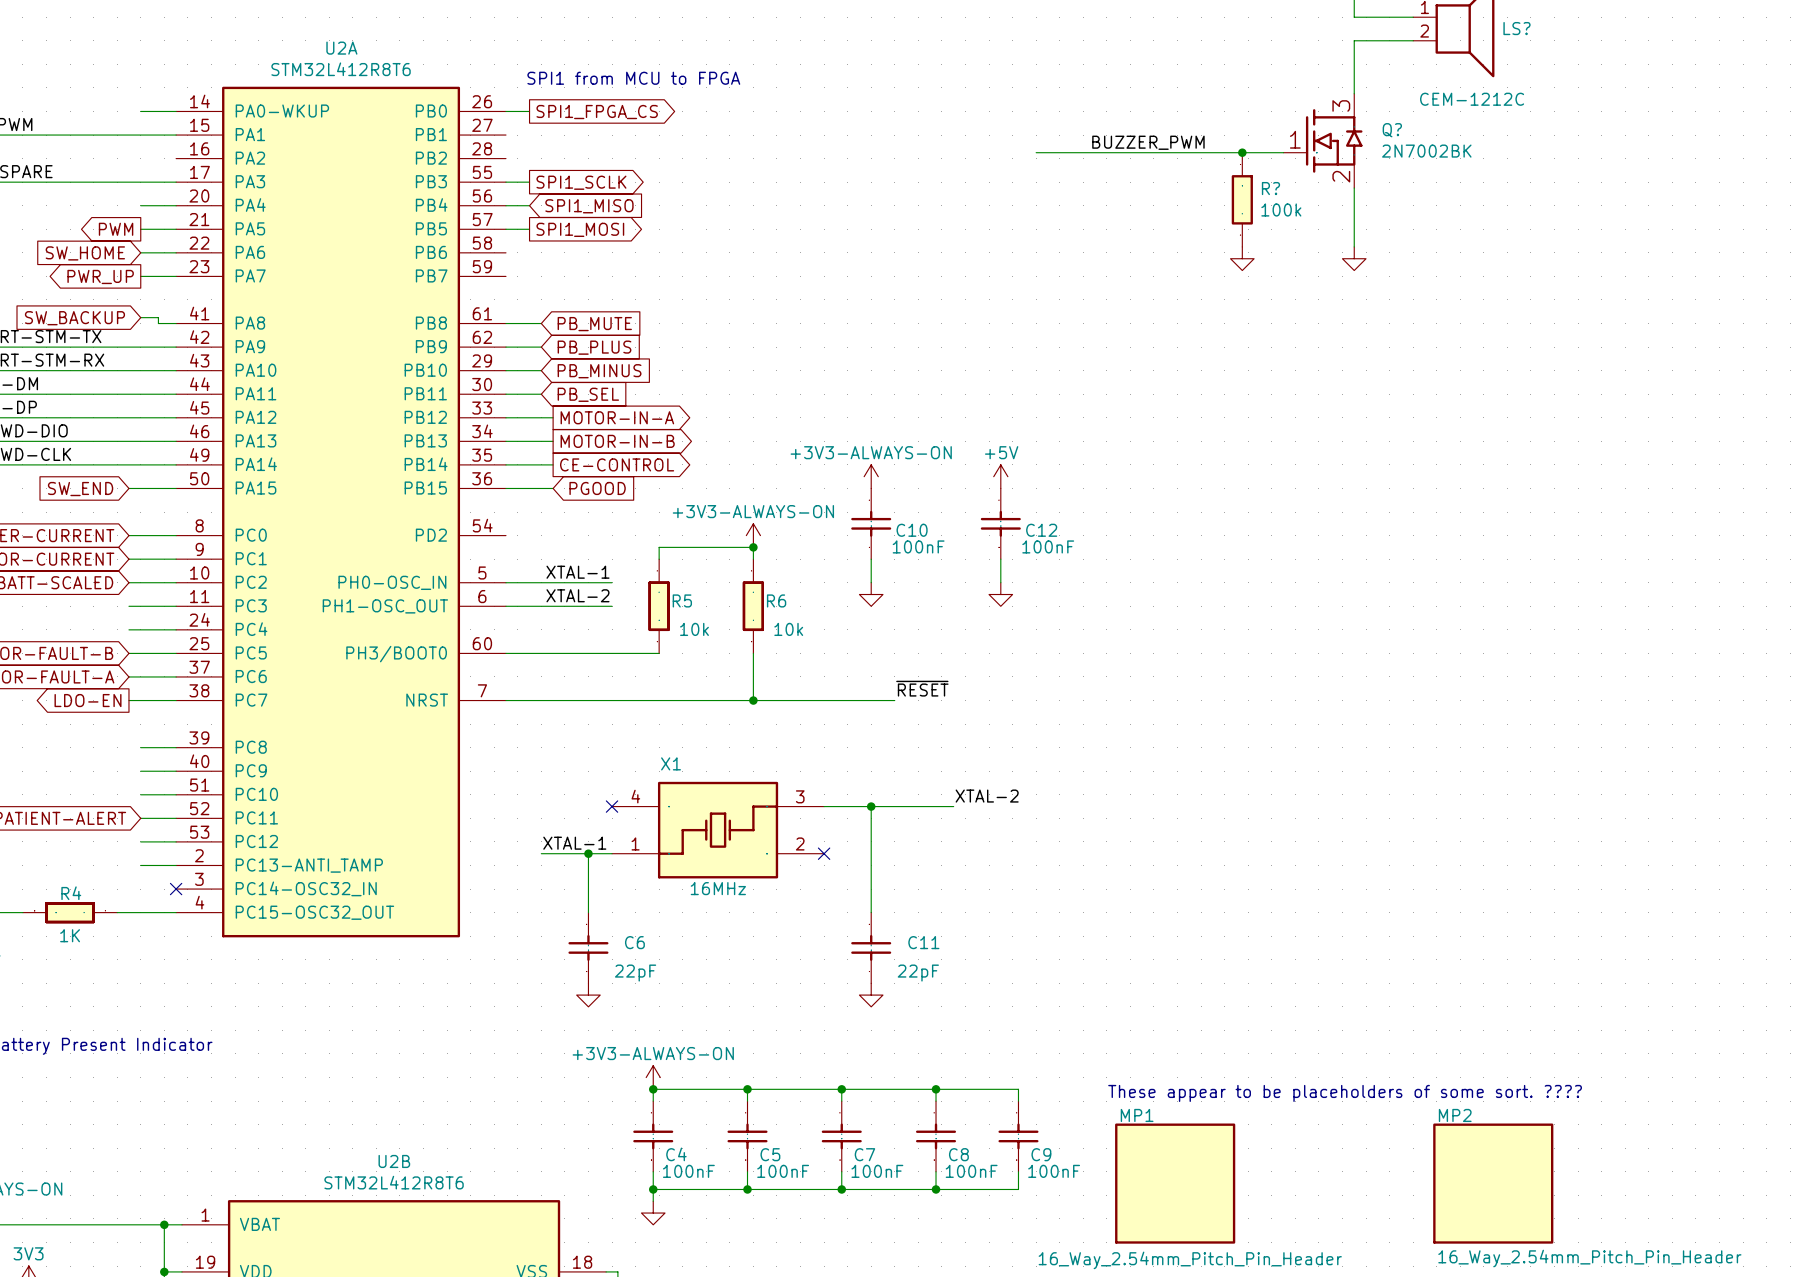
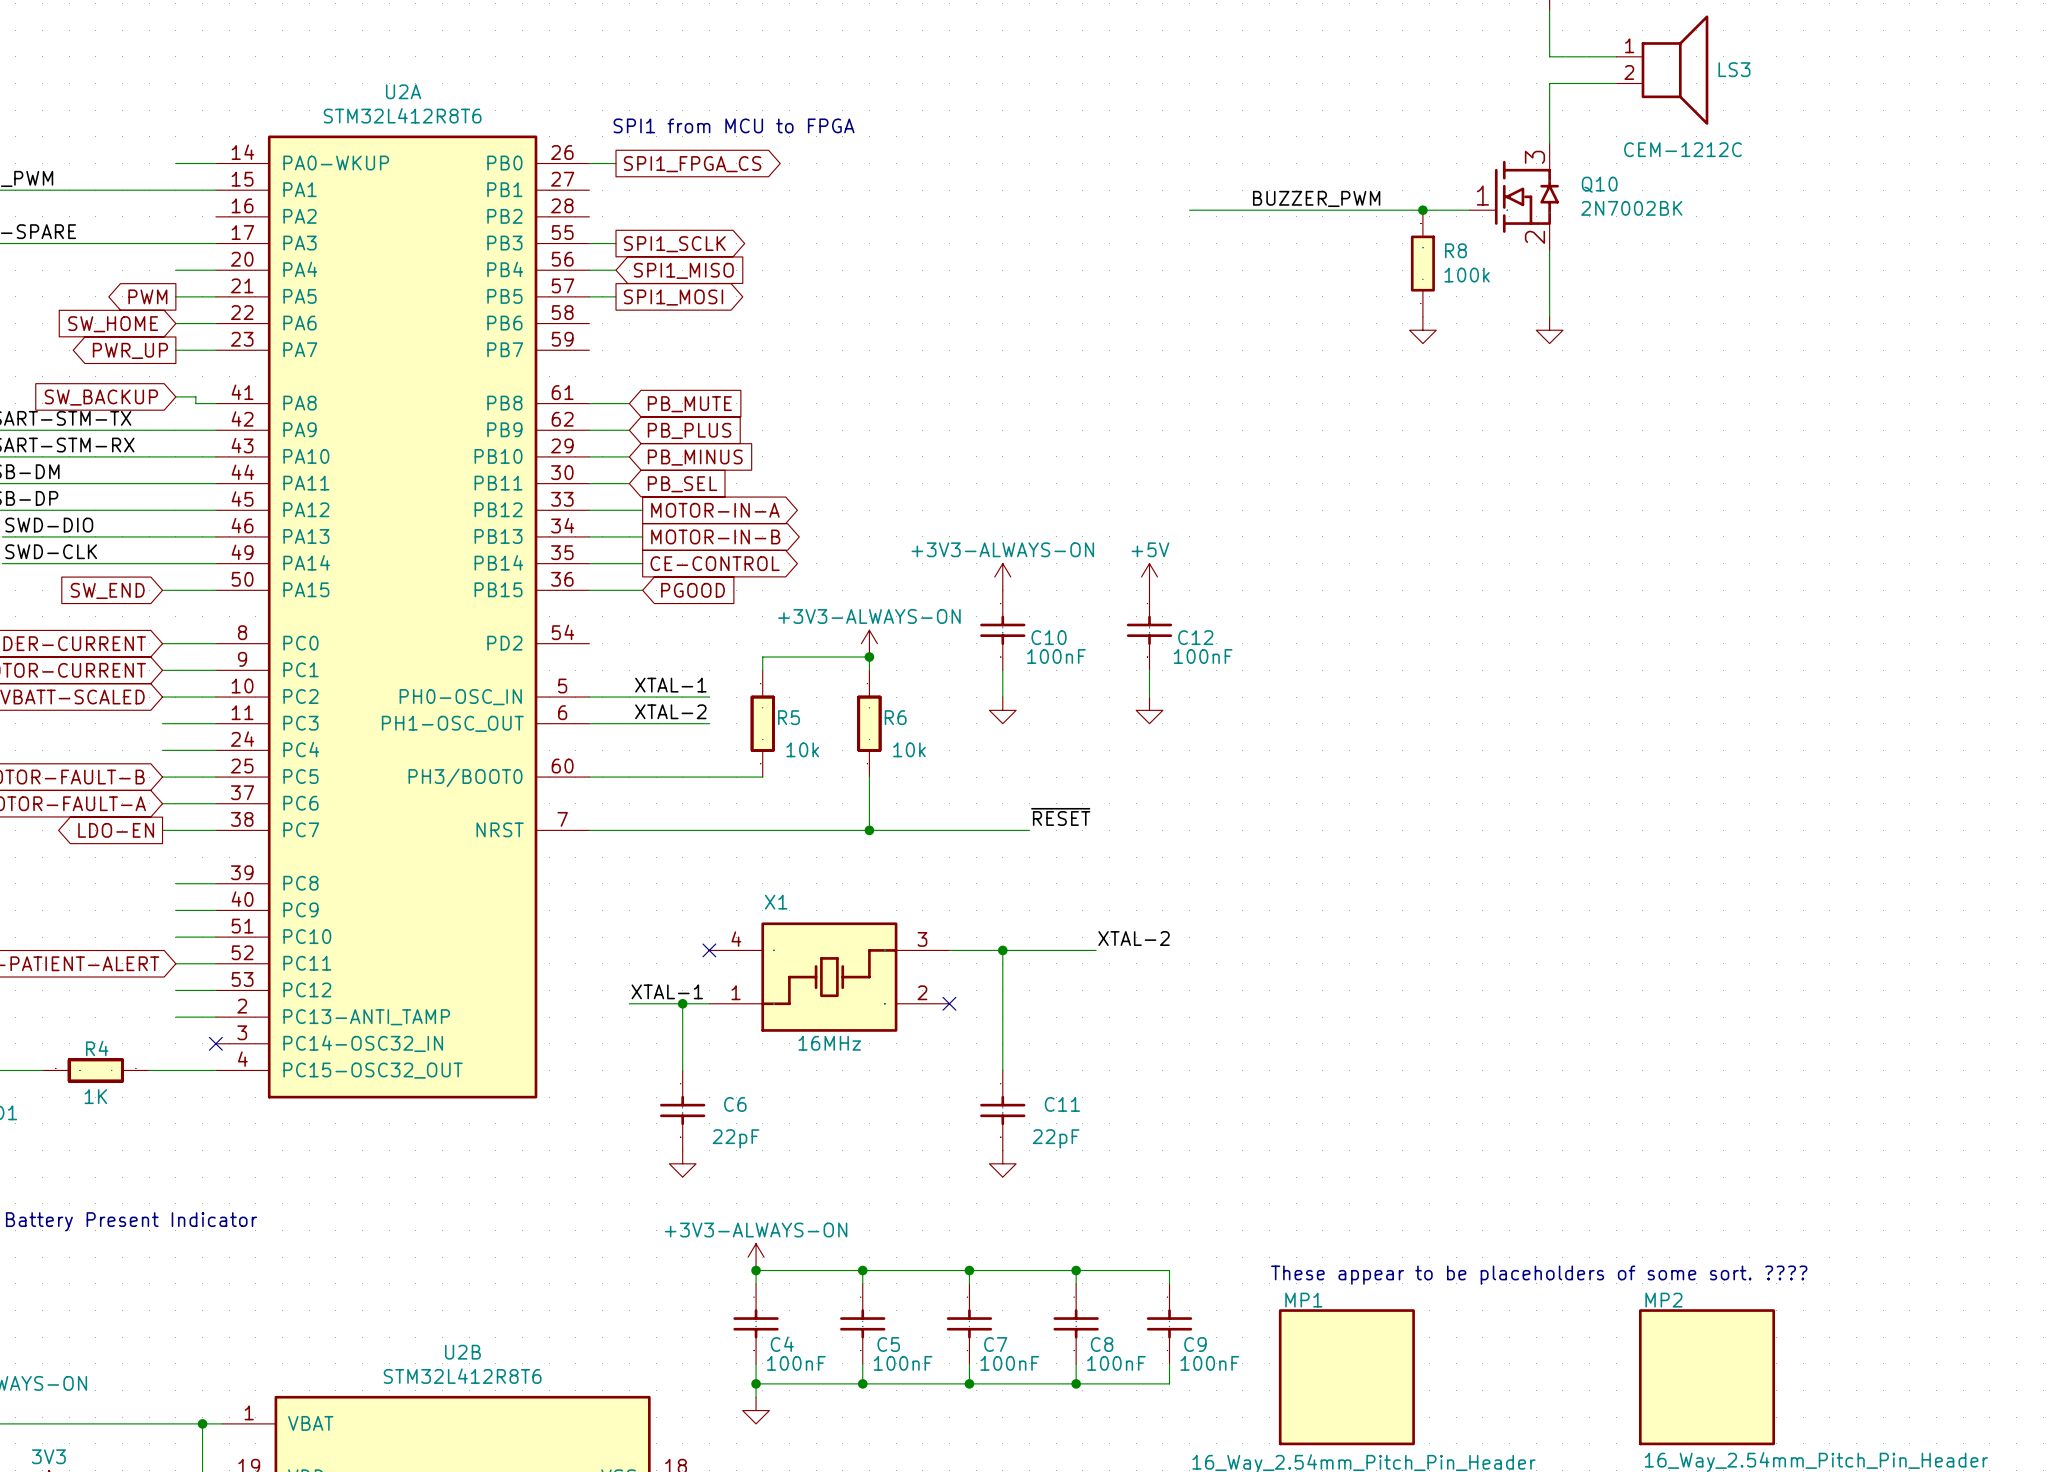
LS? name: LS? (1516, 28) -> LS3 (1734, 69)
Q? name: Q? (1392, 130) -> Q10 (1599, 184)
R? name: R? (1270, 188) -> R8 (1455, 250)

